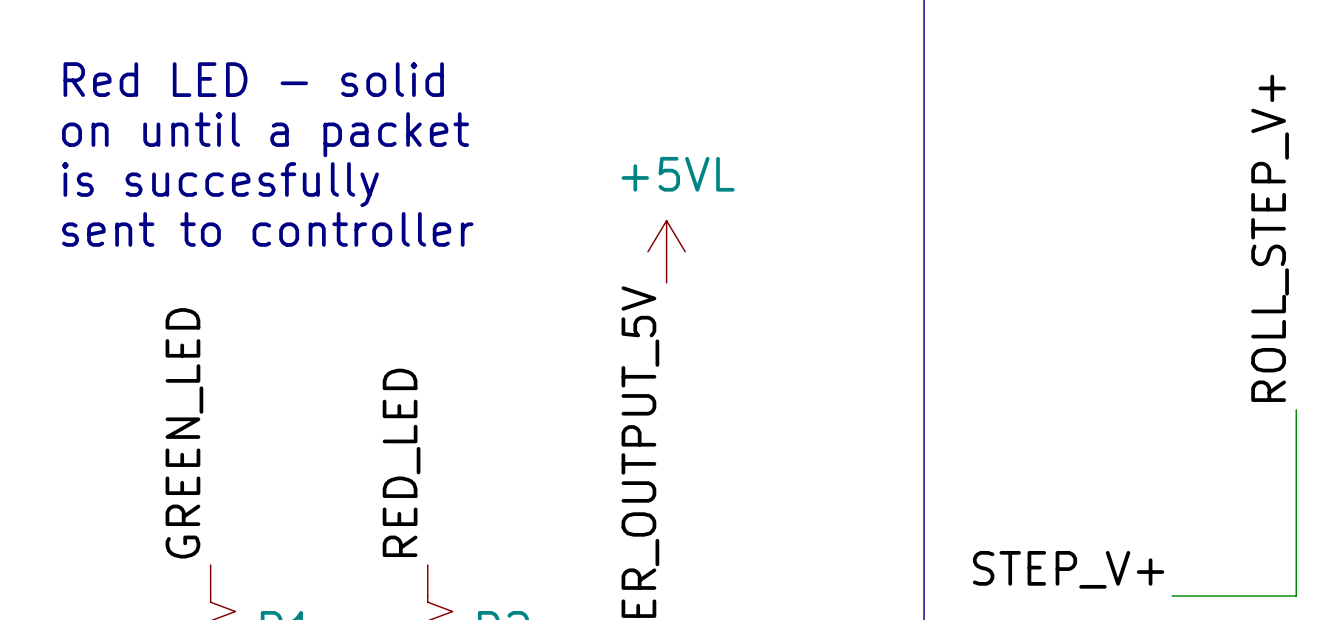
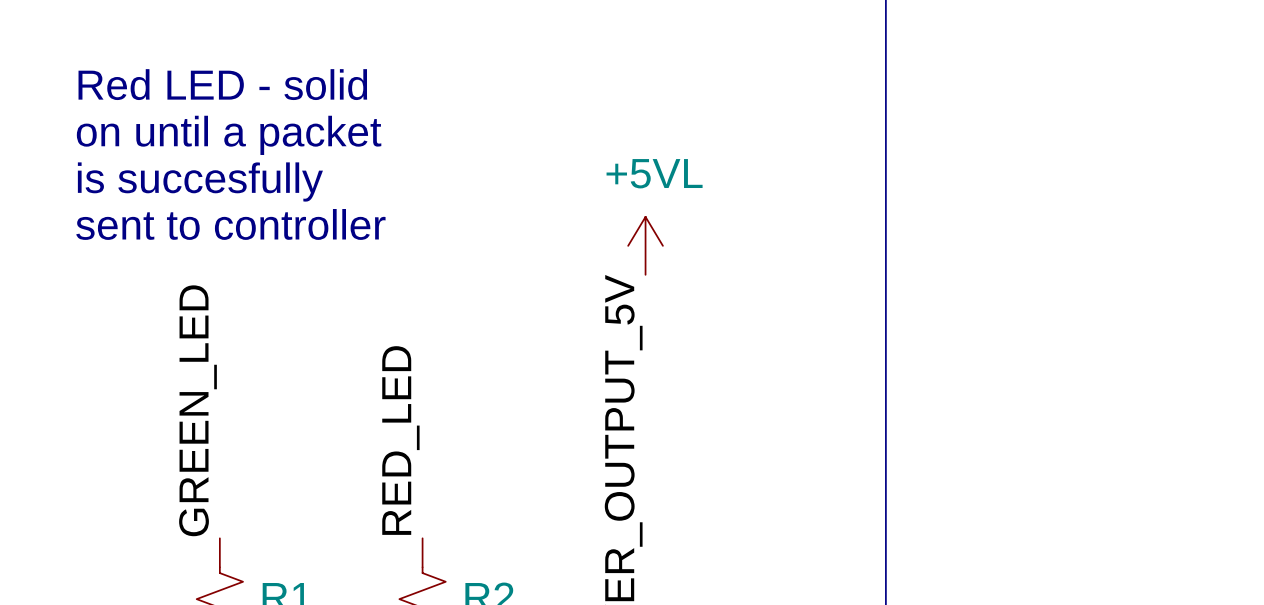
label: ROLL_STEP_V+ (1270, 238) -> none
wire: (1296, 409) (1296, 596) (1172, 596) -> none
label: STEP_V+ (1068, 569) -> none

